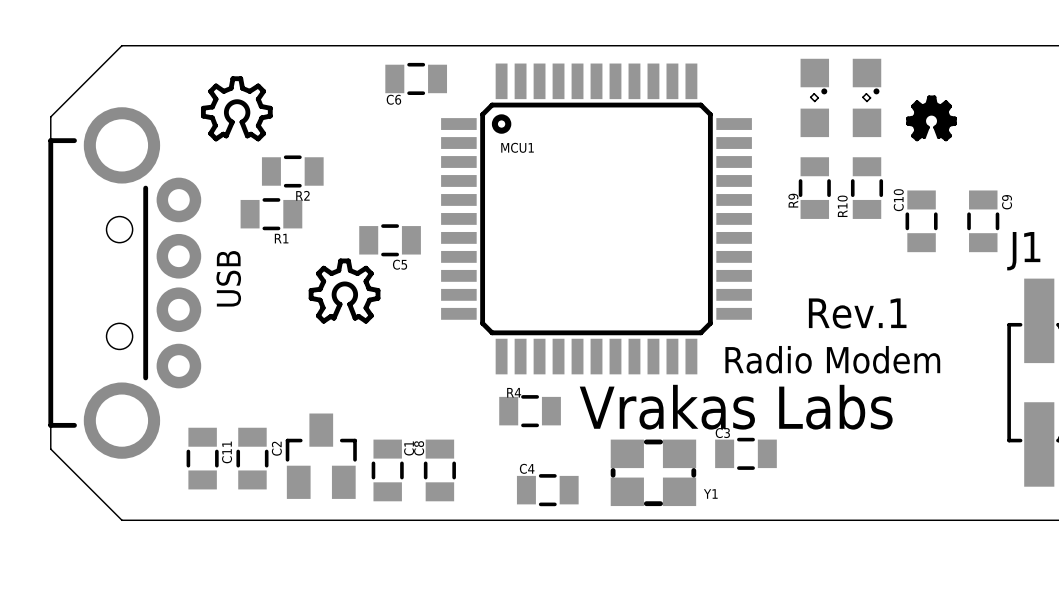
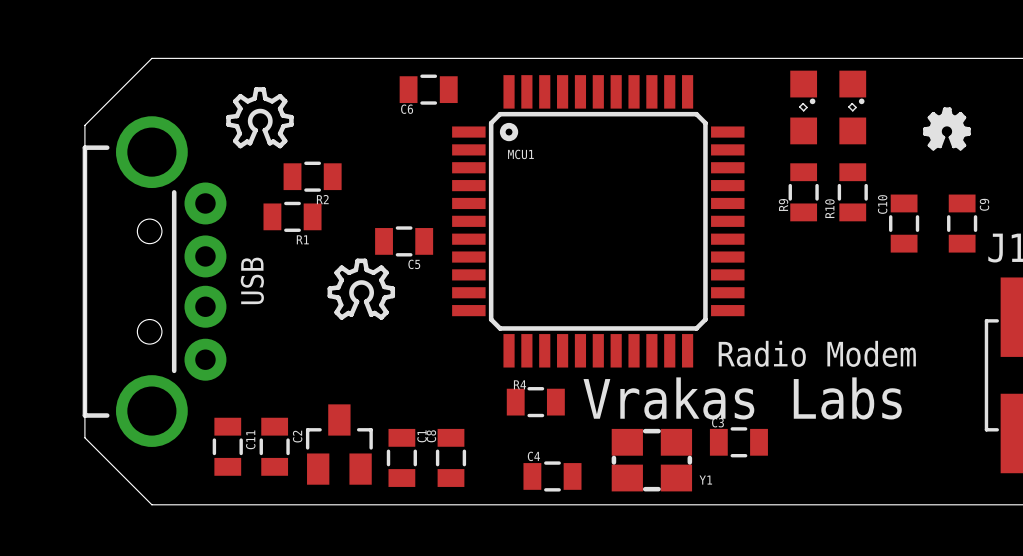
drawing position: (931, 118) -> (946, 128)
text: Rev.1 (857, 313) -> none

